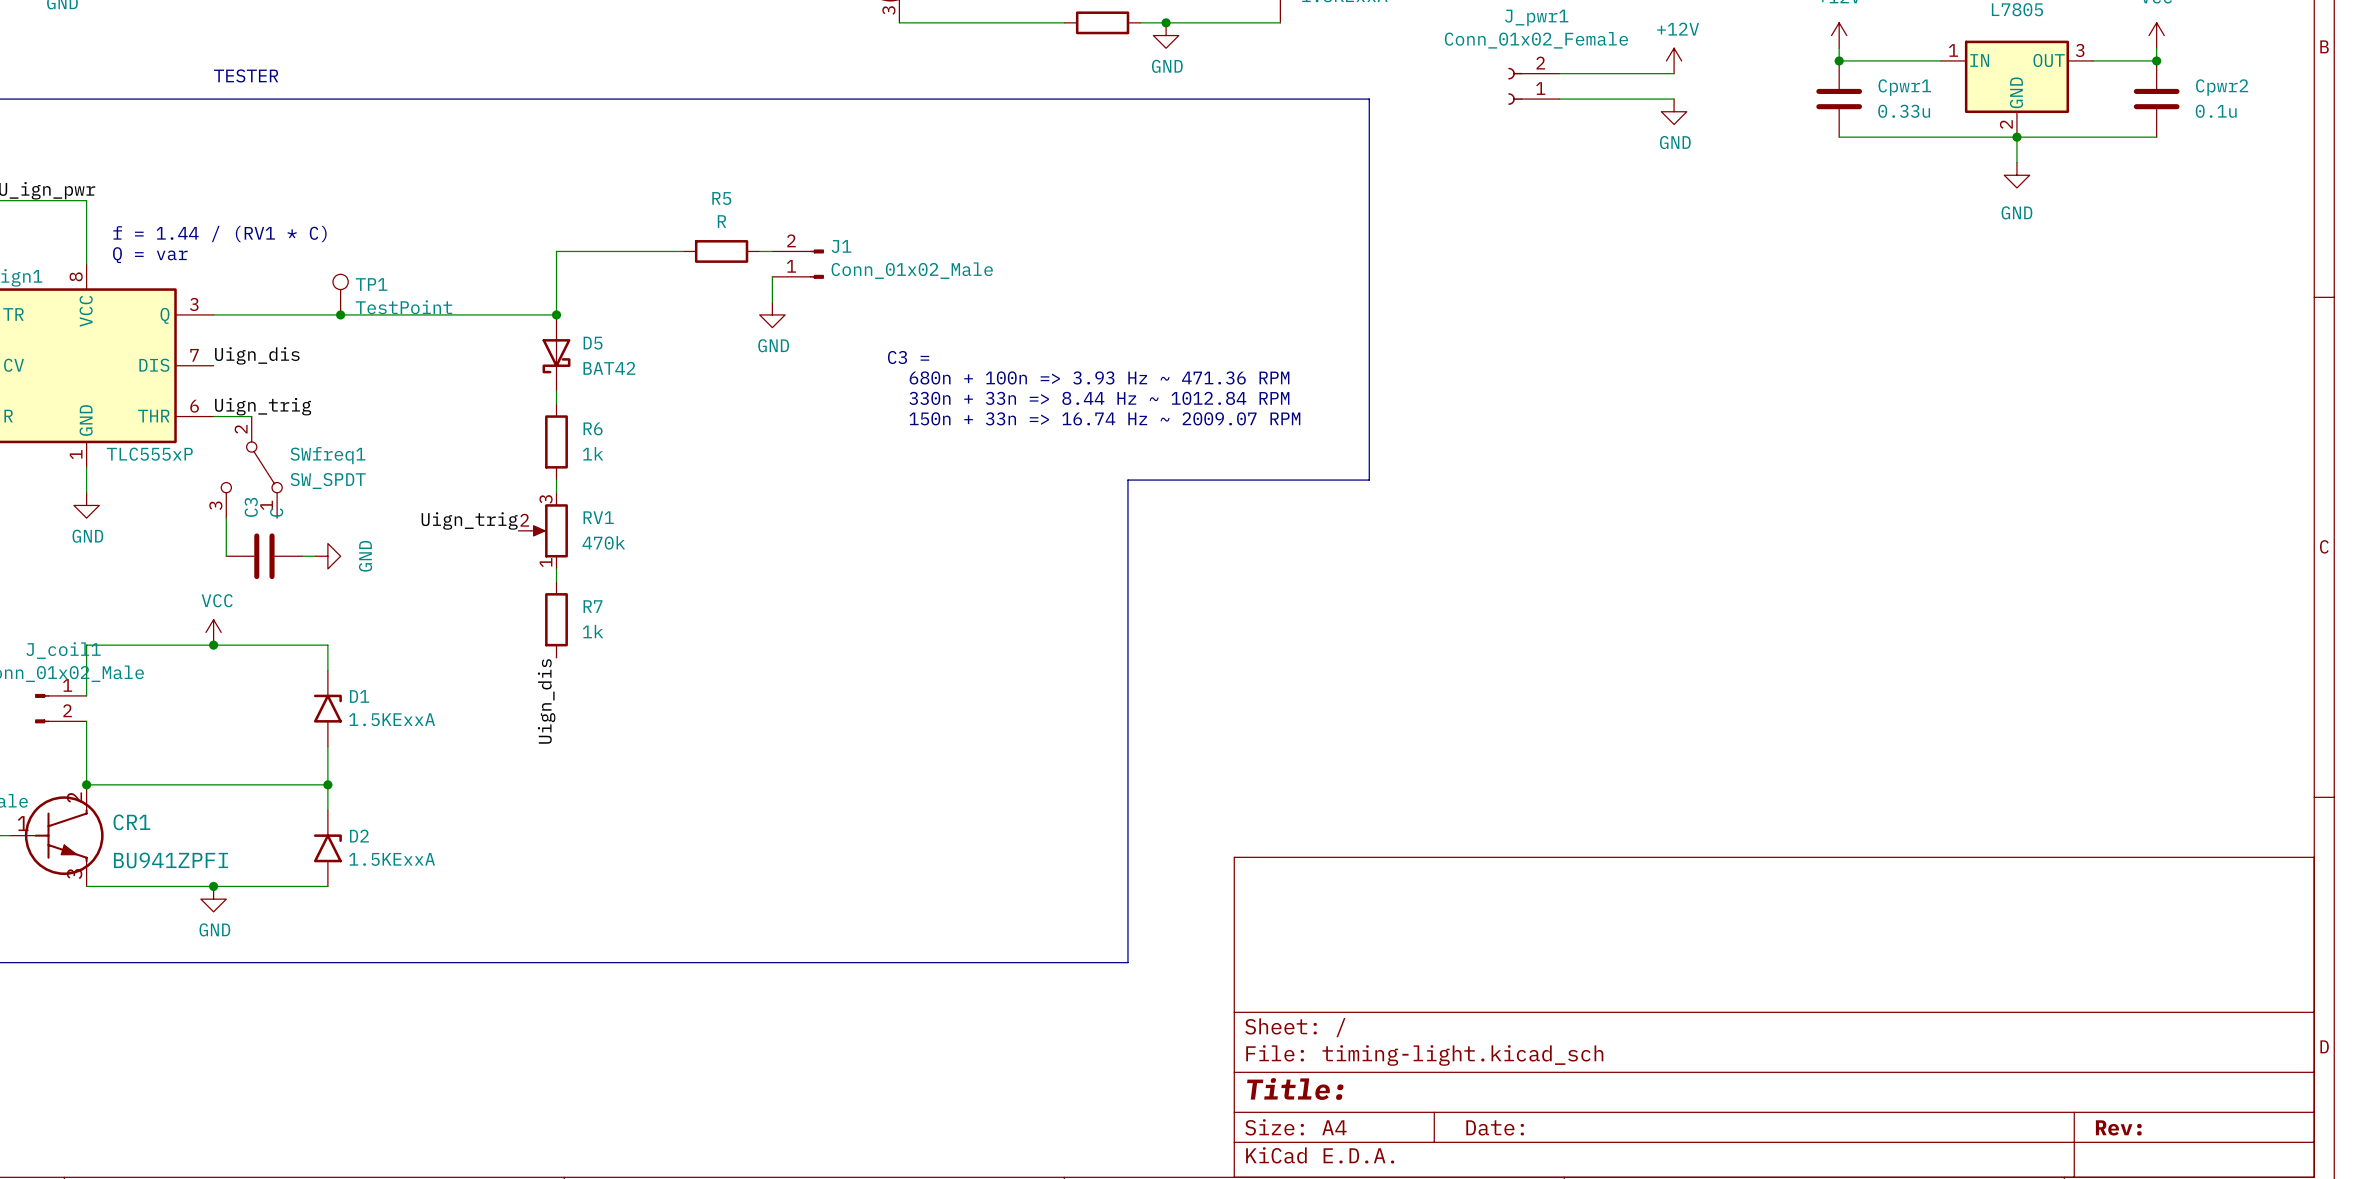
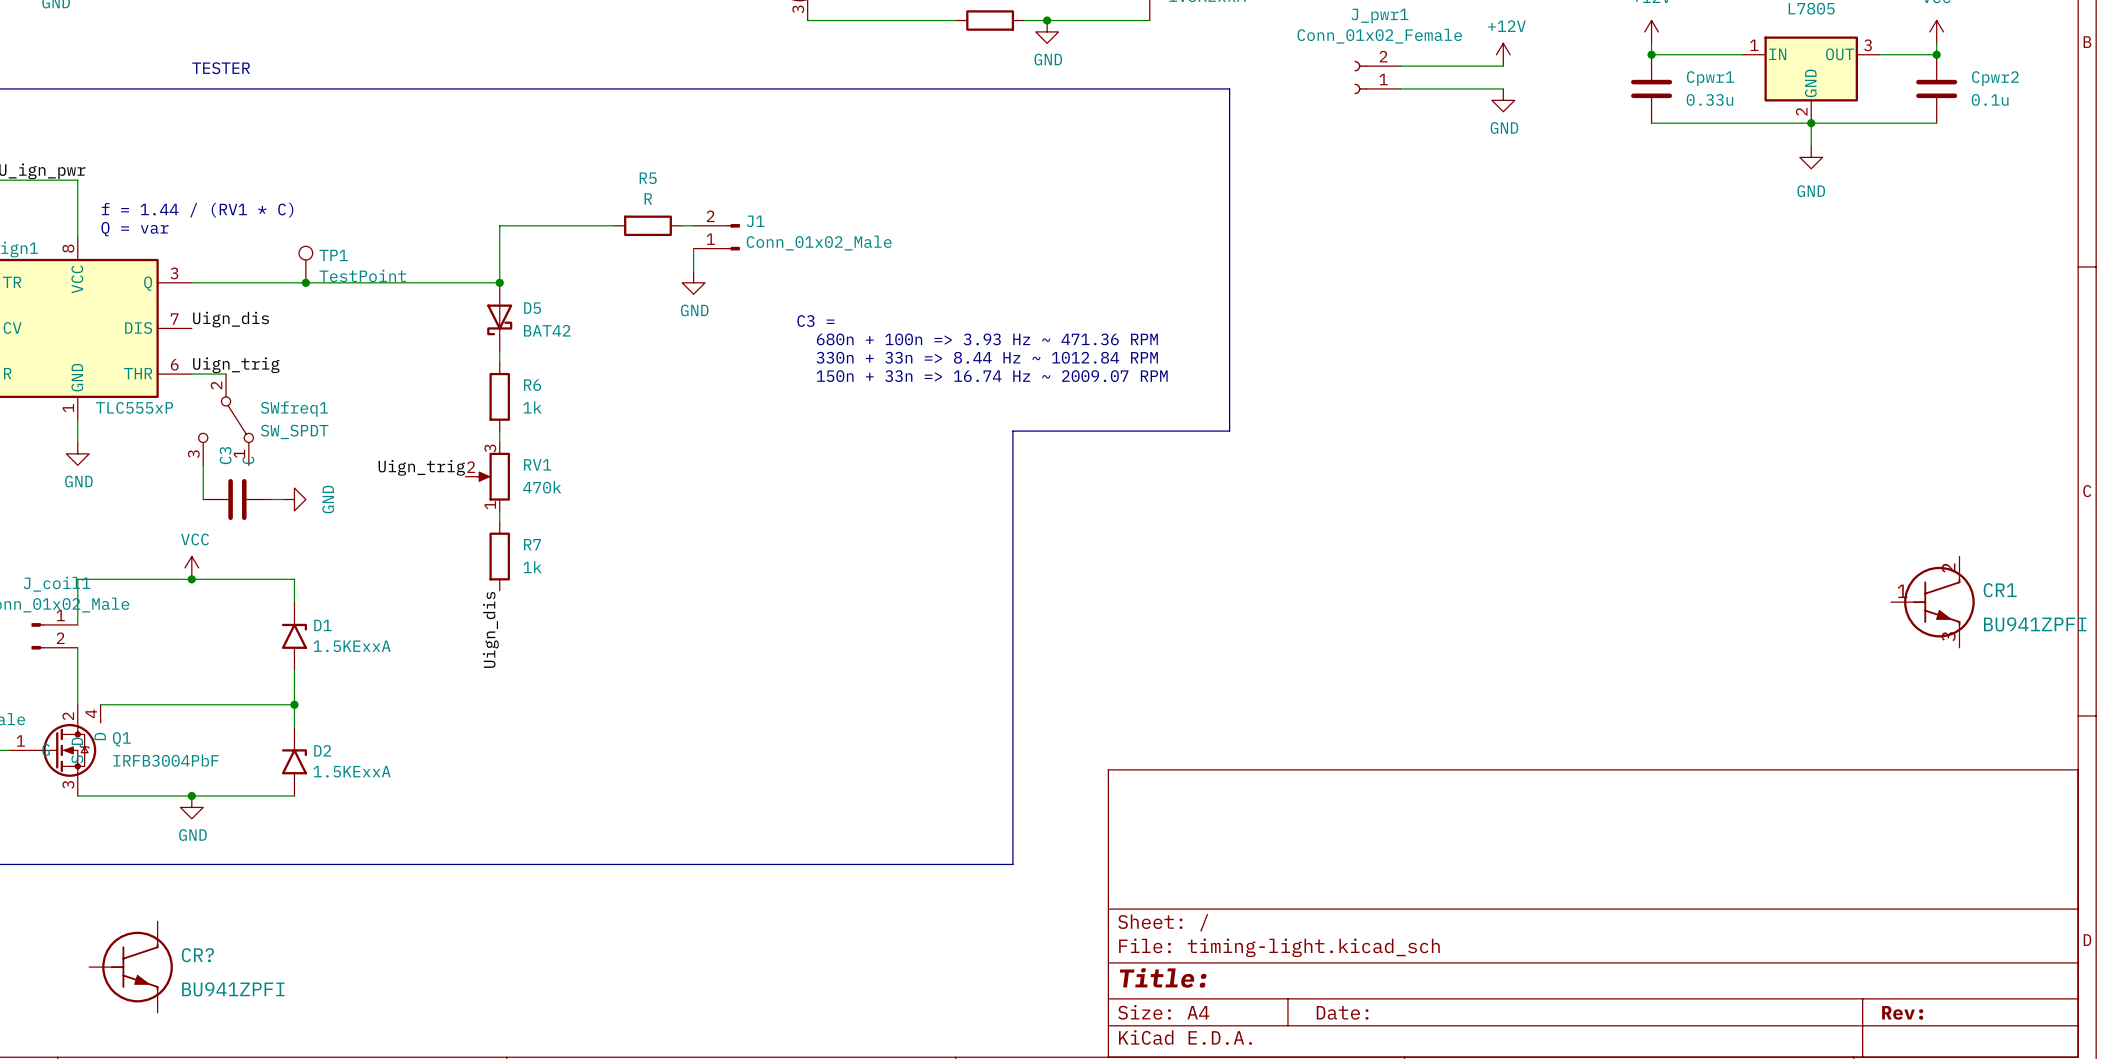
wire: (86, 784) (112, 784) -> none
junction: (86, 784) -> none
CR1 position: (57, 835) -> (1932, 602)
Q1: none -> IRFB3004PbF (54, 750)
CR?: none -> BU941ZPFI (131, 967)

